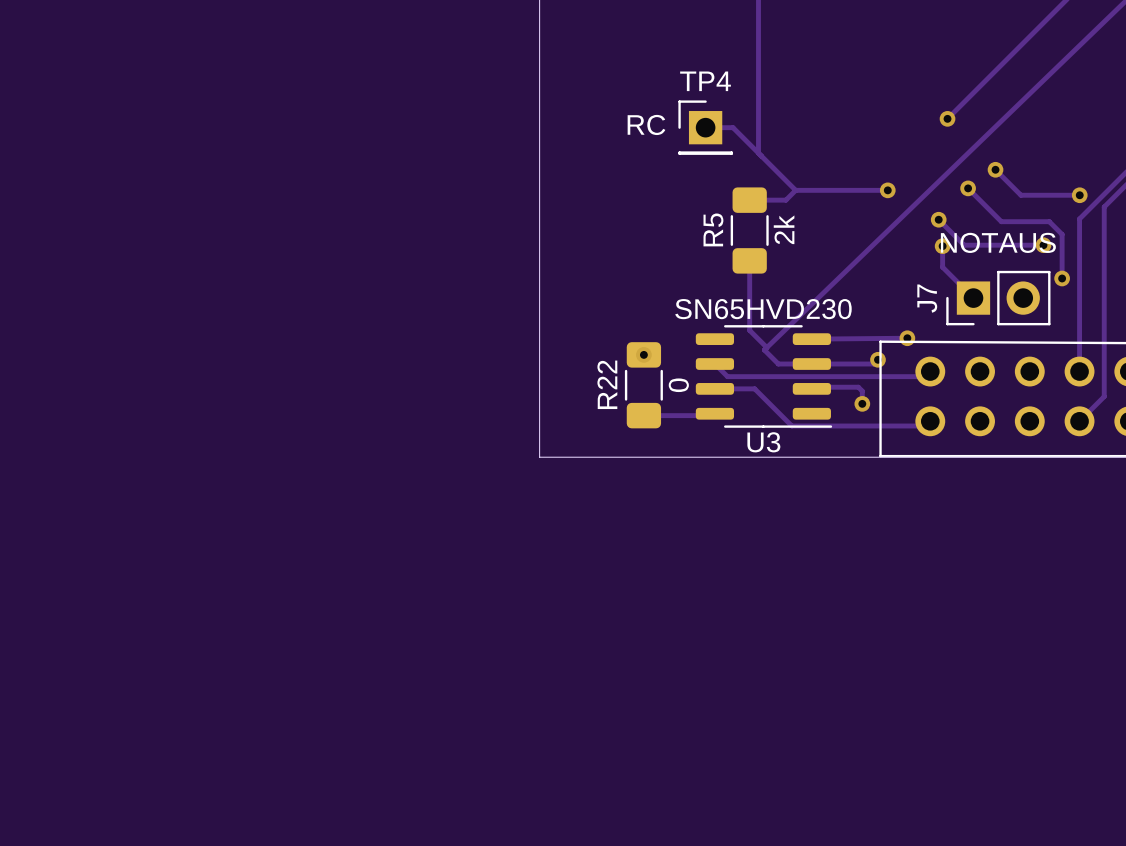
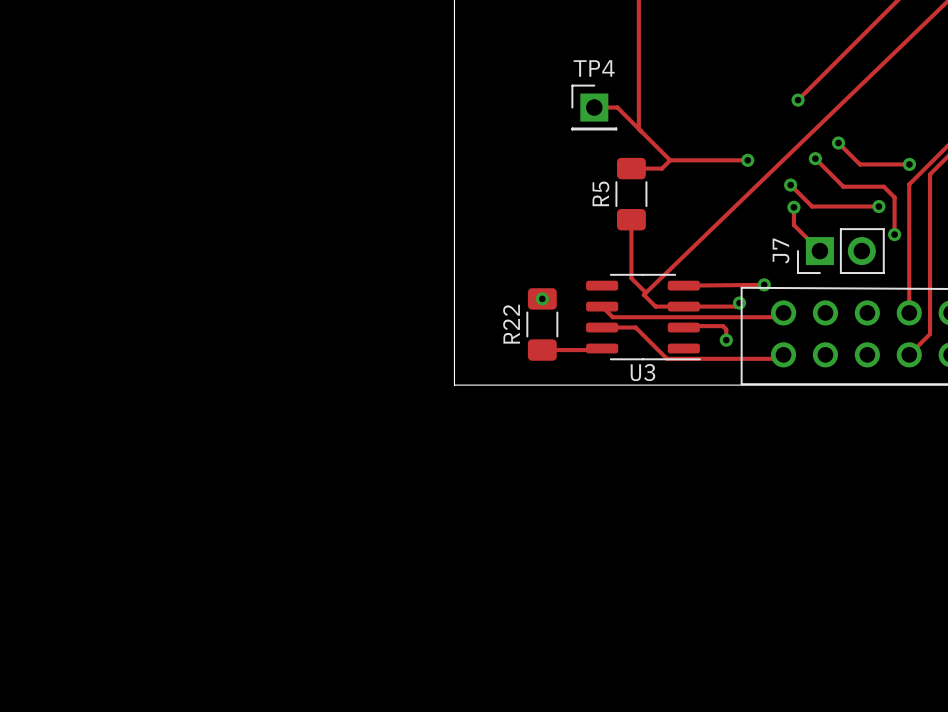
text: RC (646, 124) -> none
R5 value: 2k (784, 229) -> none
text: NOTAUS (998, 242) -> none
U3 value: SN65HVD230 (763, 309) -> none
R22 value: 0 (678, 385) -> none

